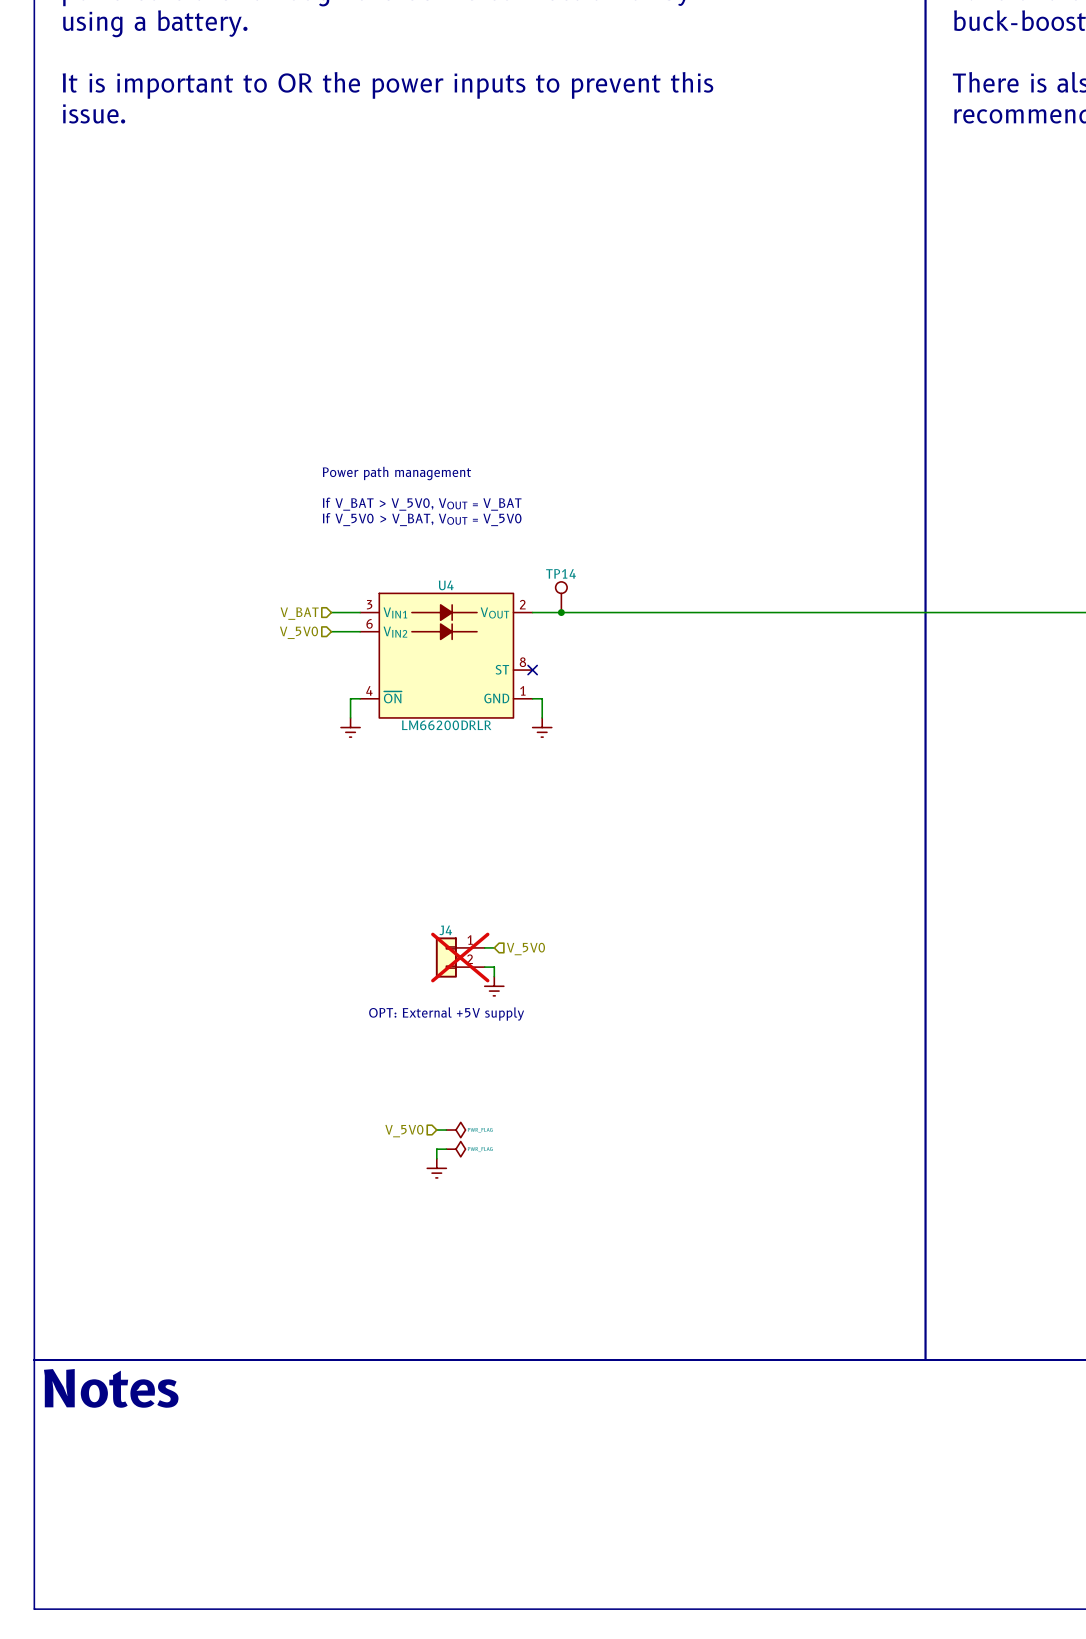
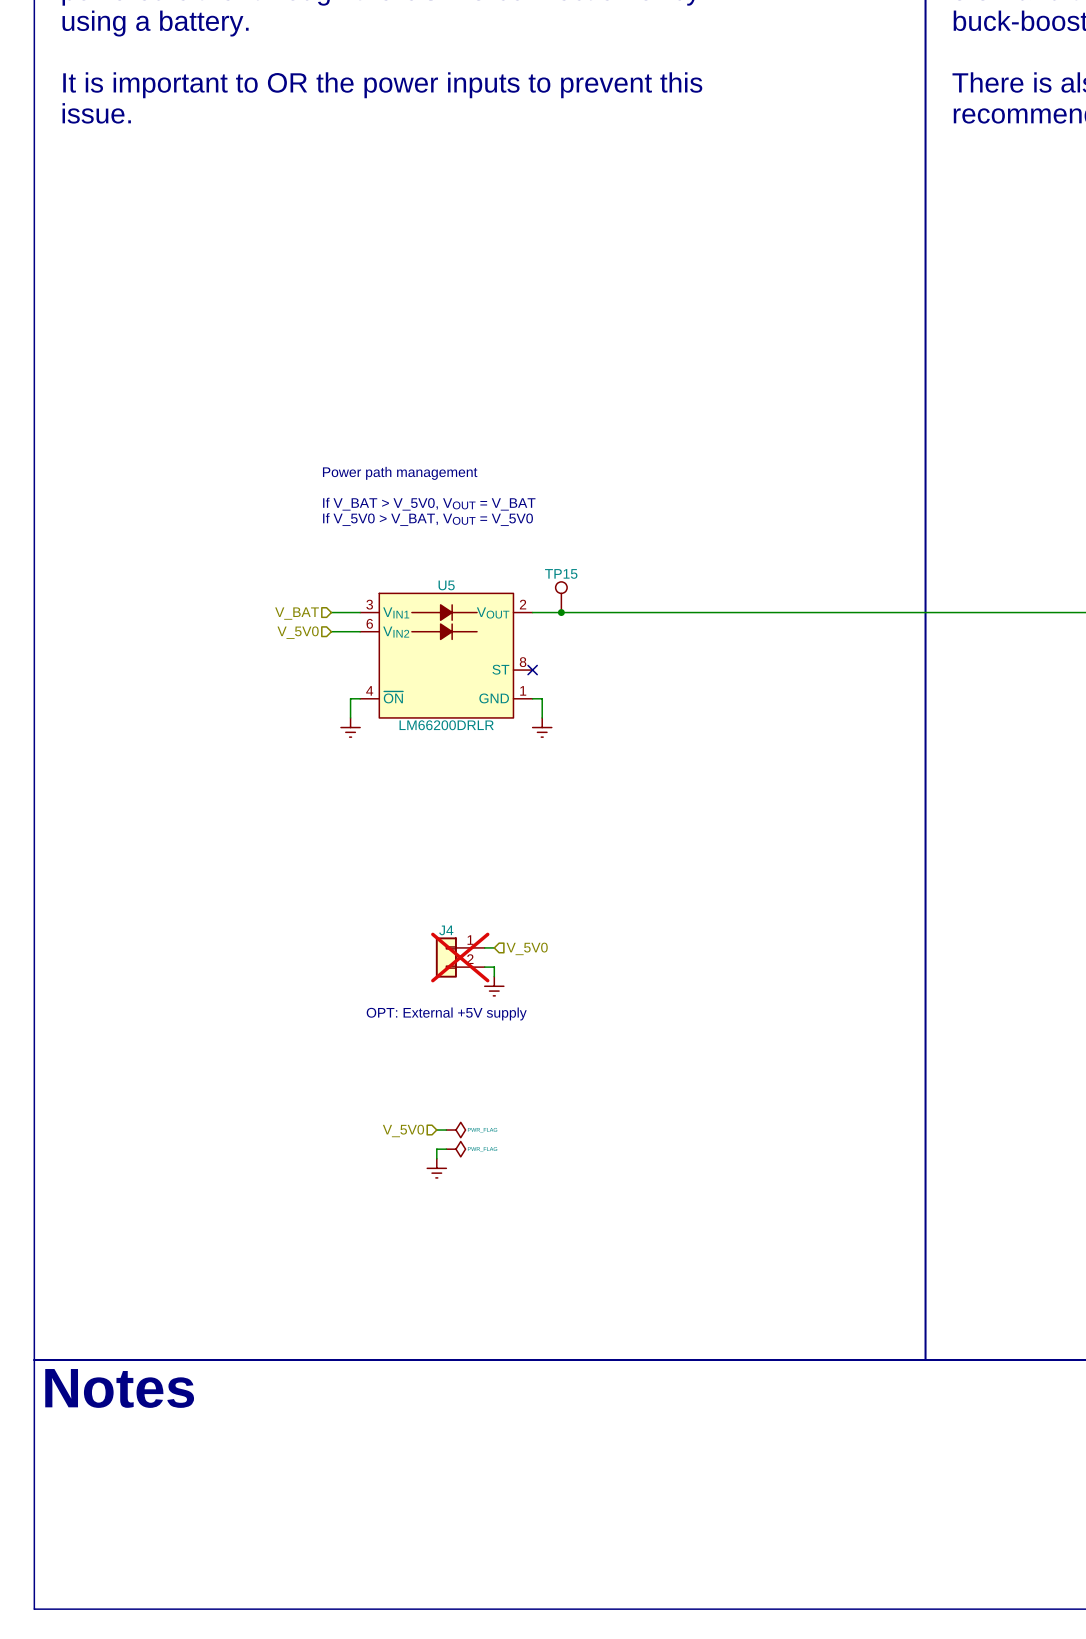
TP14 name: TP14 (561, 573) -> TP15 (561, 573)
U4 name: U4 (446, 585) -> U5 (446, 585)

